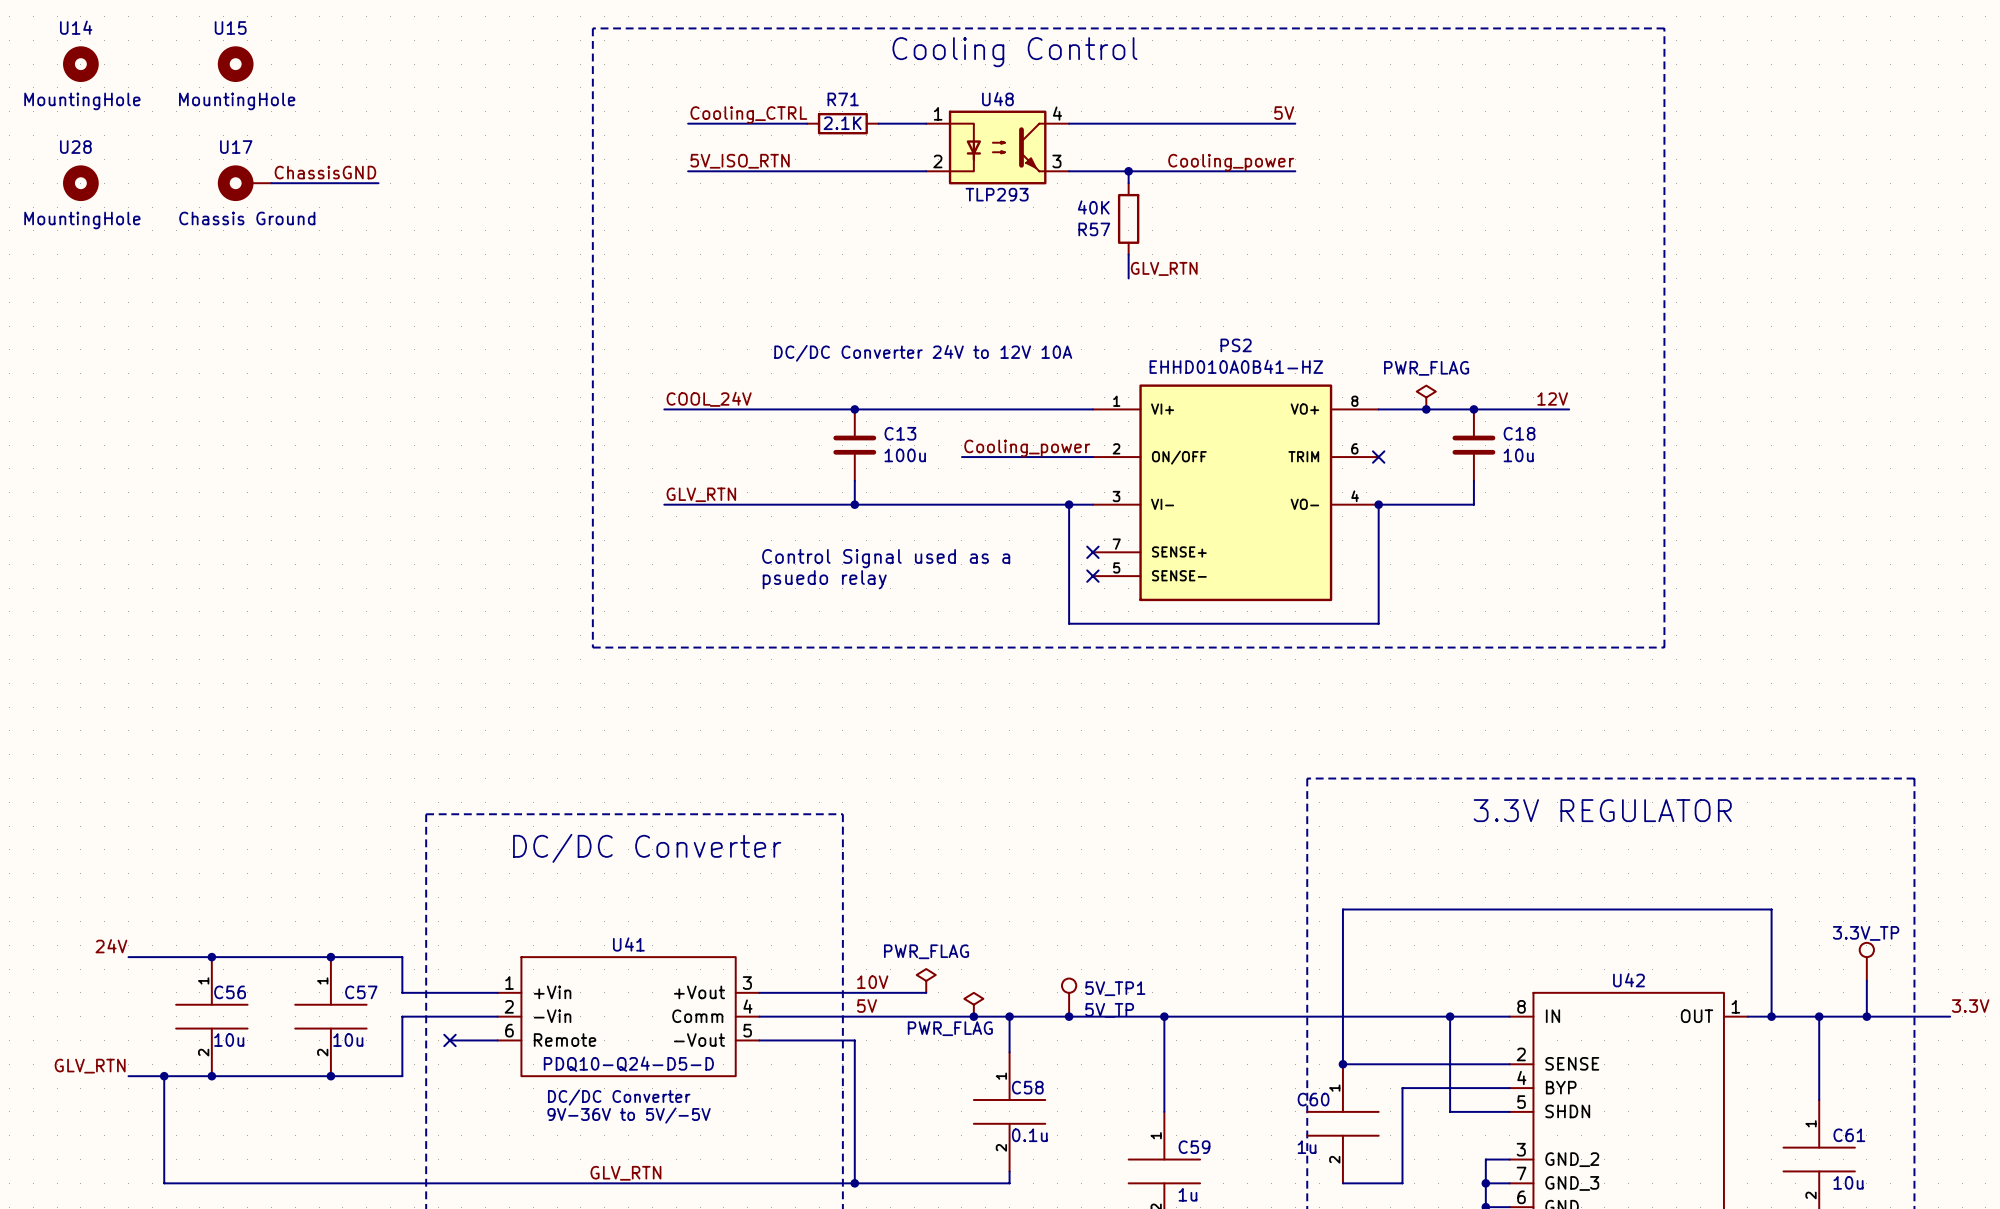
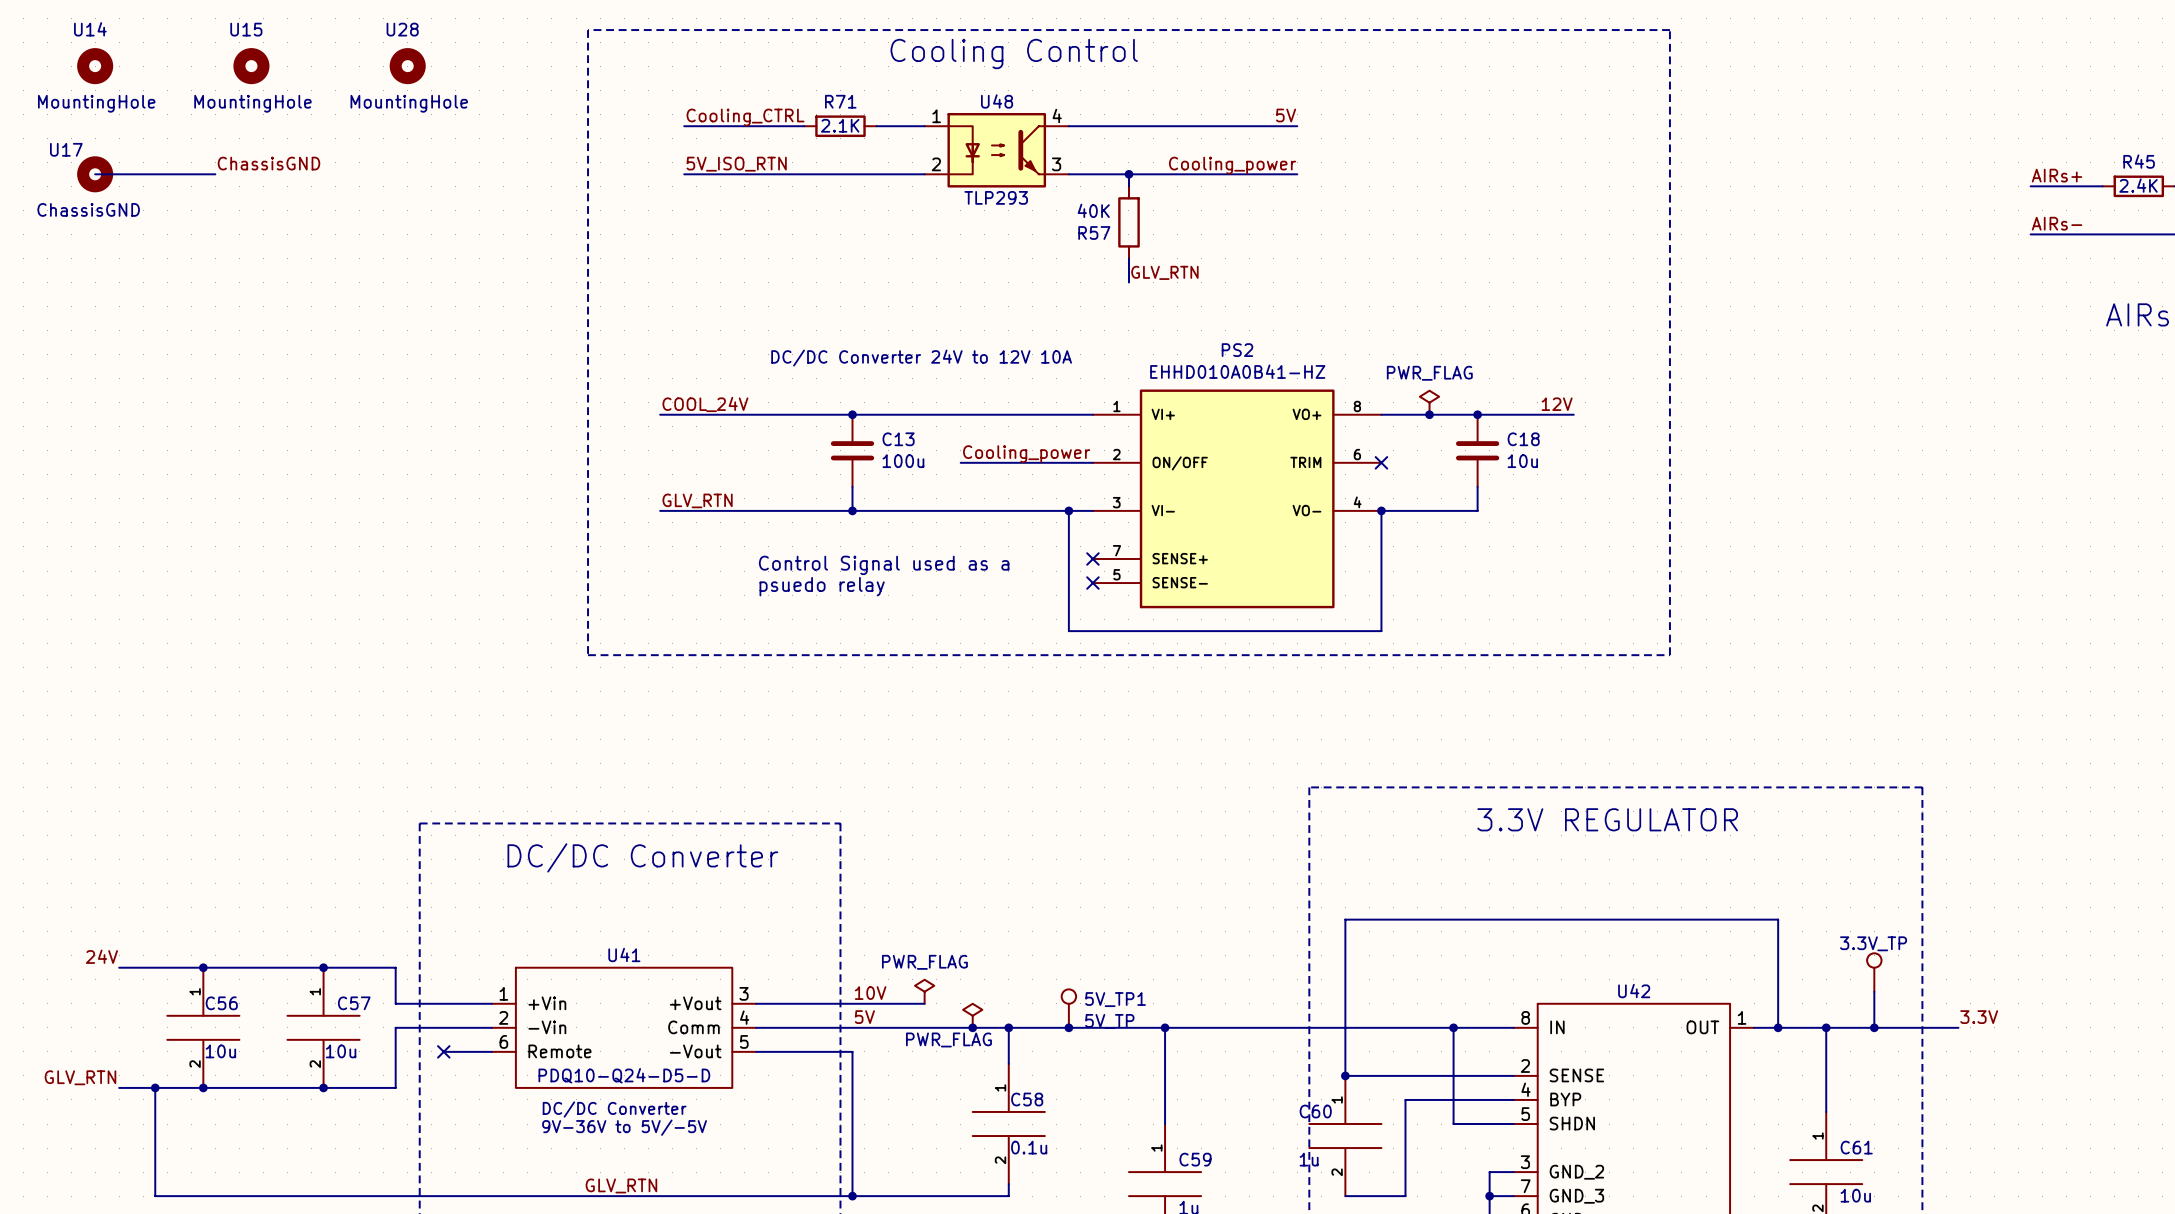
U14 position: (80, 64) -> (95, 66)
U15 position: (235, 64) -> (251, 66)
U17 name position: U17 (236, 147) -> U17 (66, 149)
U17 symbol: [217, 165, 272, 202] -> [77, 156, 114, 193]
wire: none -> (95, 174) (215, 174)
label position: ChassisGND (325, 172) -> ChassisGND (268, 163)
U28 position: (80, 183) -> (407, 66)
wire: (271, 183) (378, 183) -> none
U17 value: Chassis Ground (247, 218) -> ChassisGND (88, 209)

